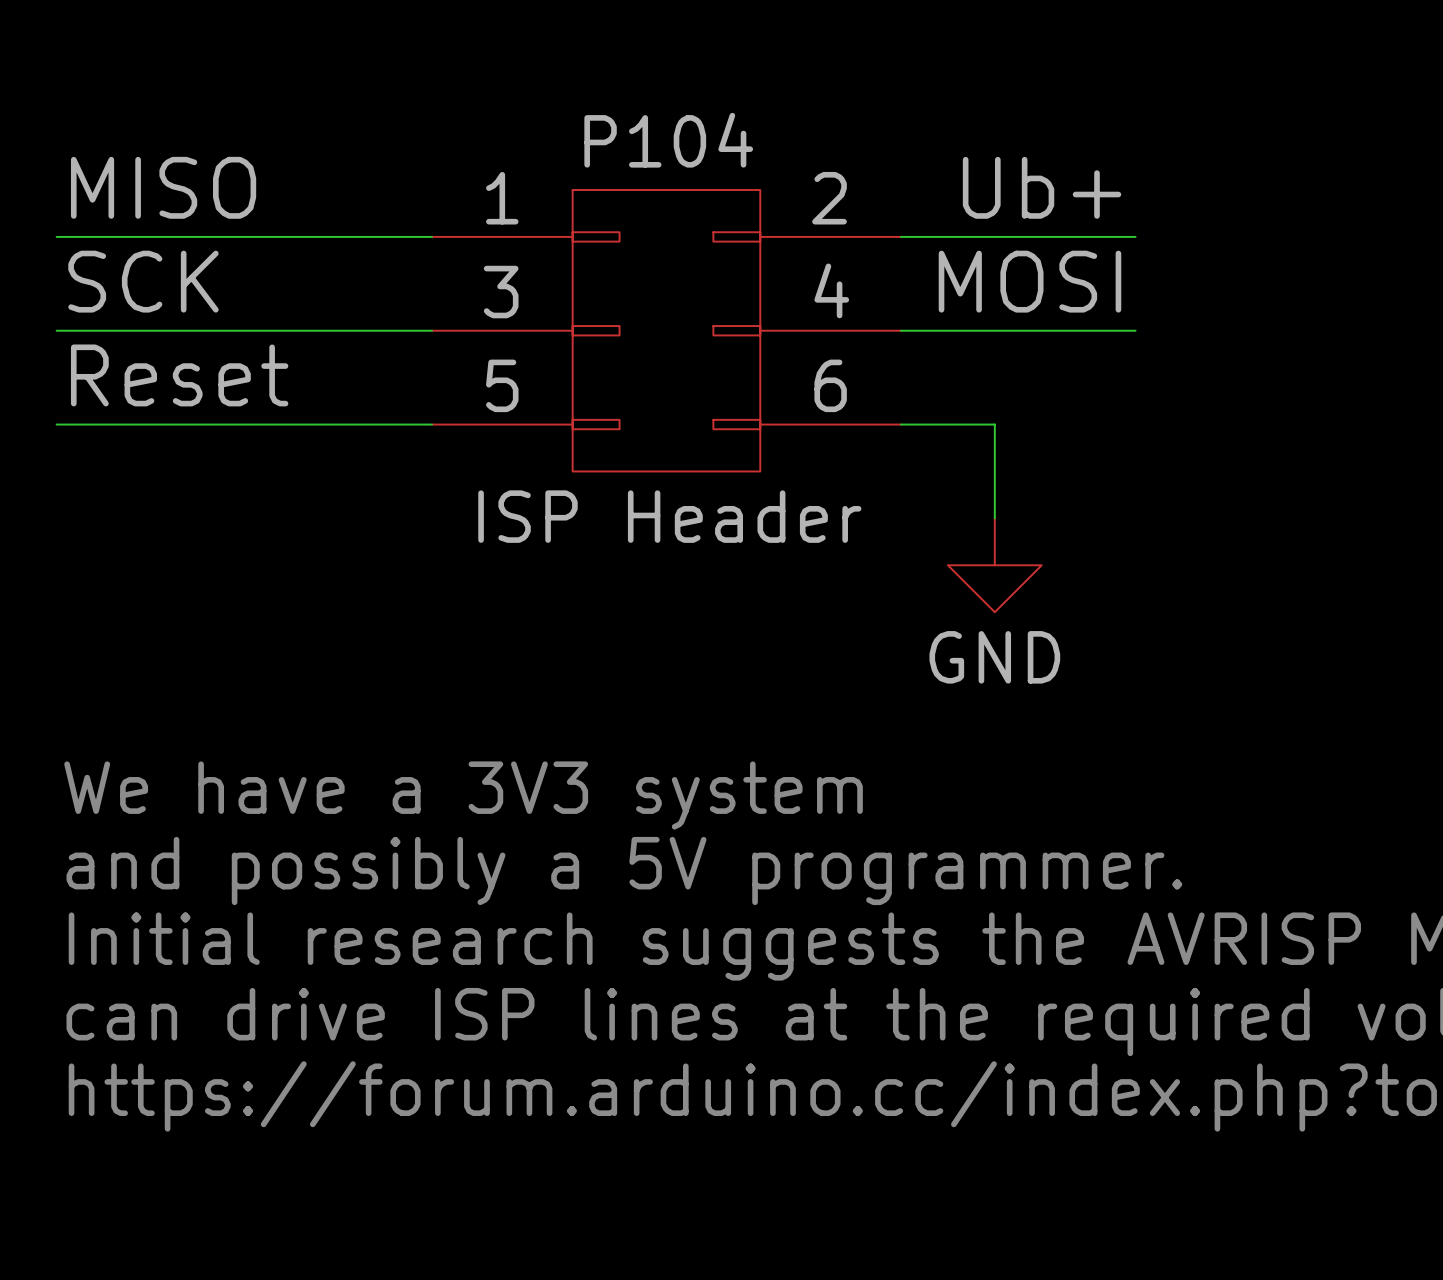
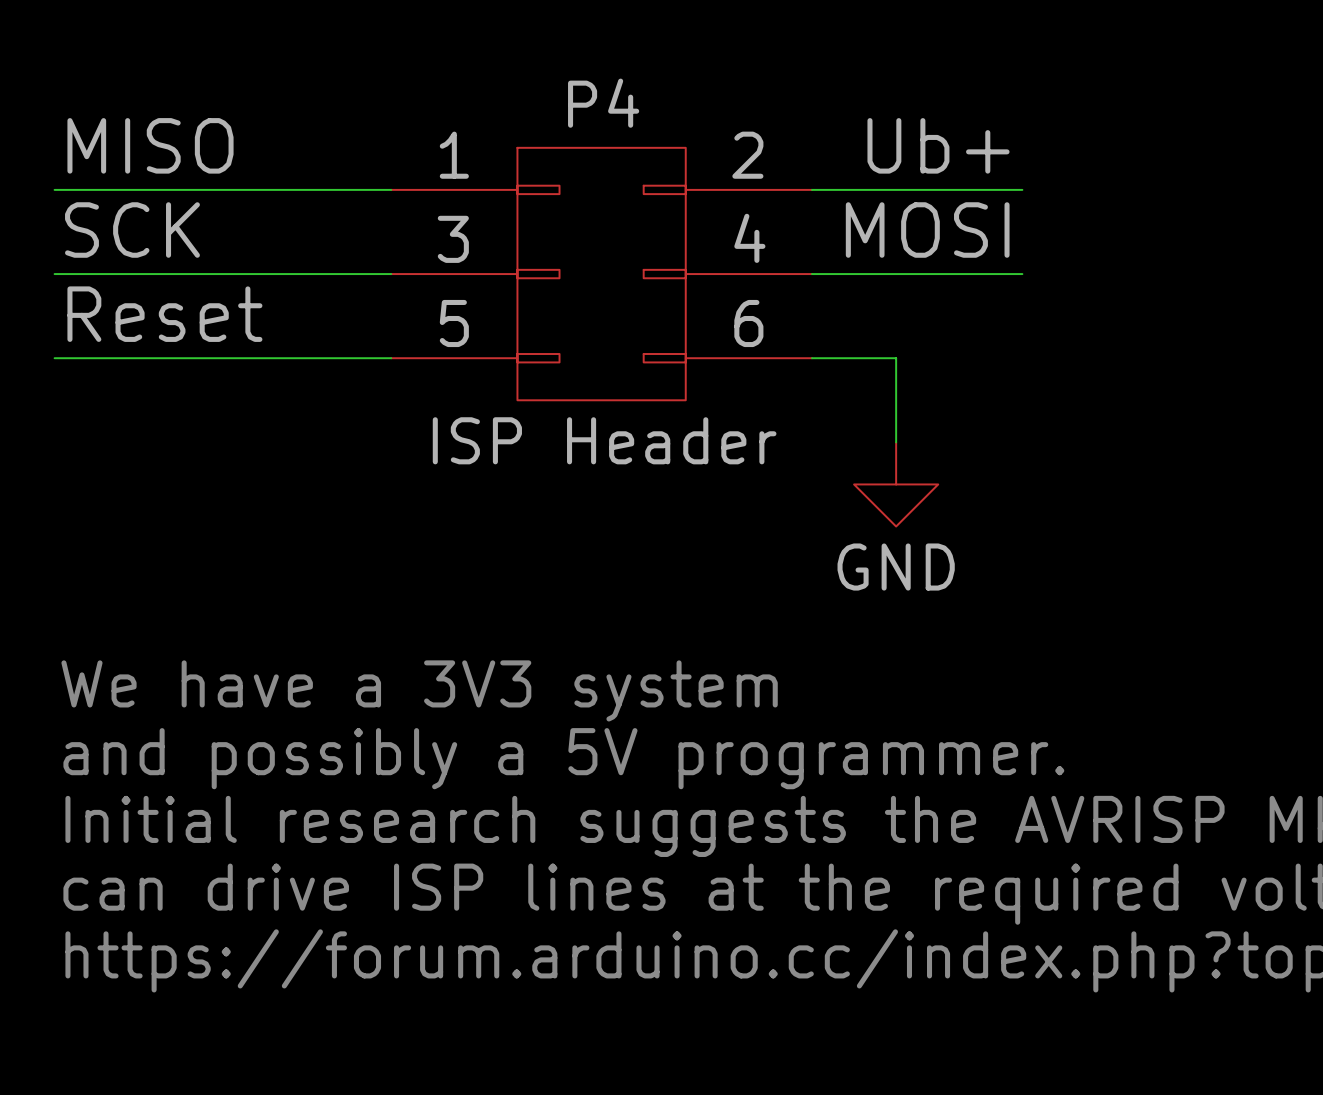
P104 name: P104 (668, 140) -> P4 (603, 103)

